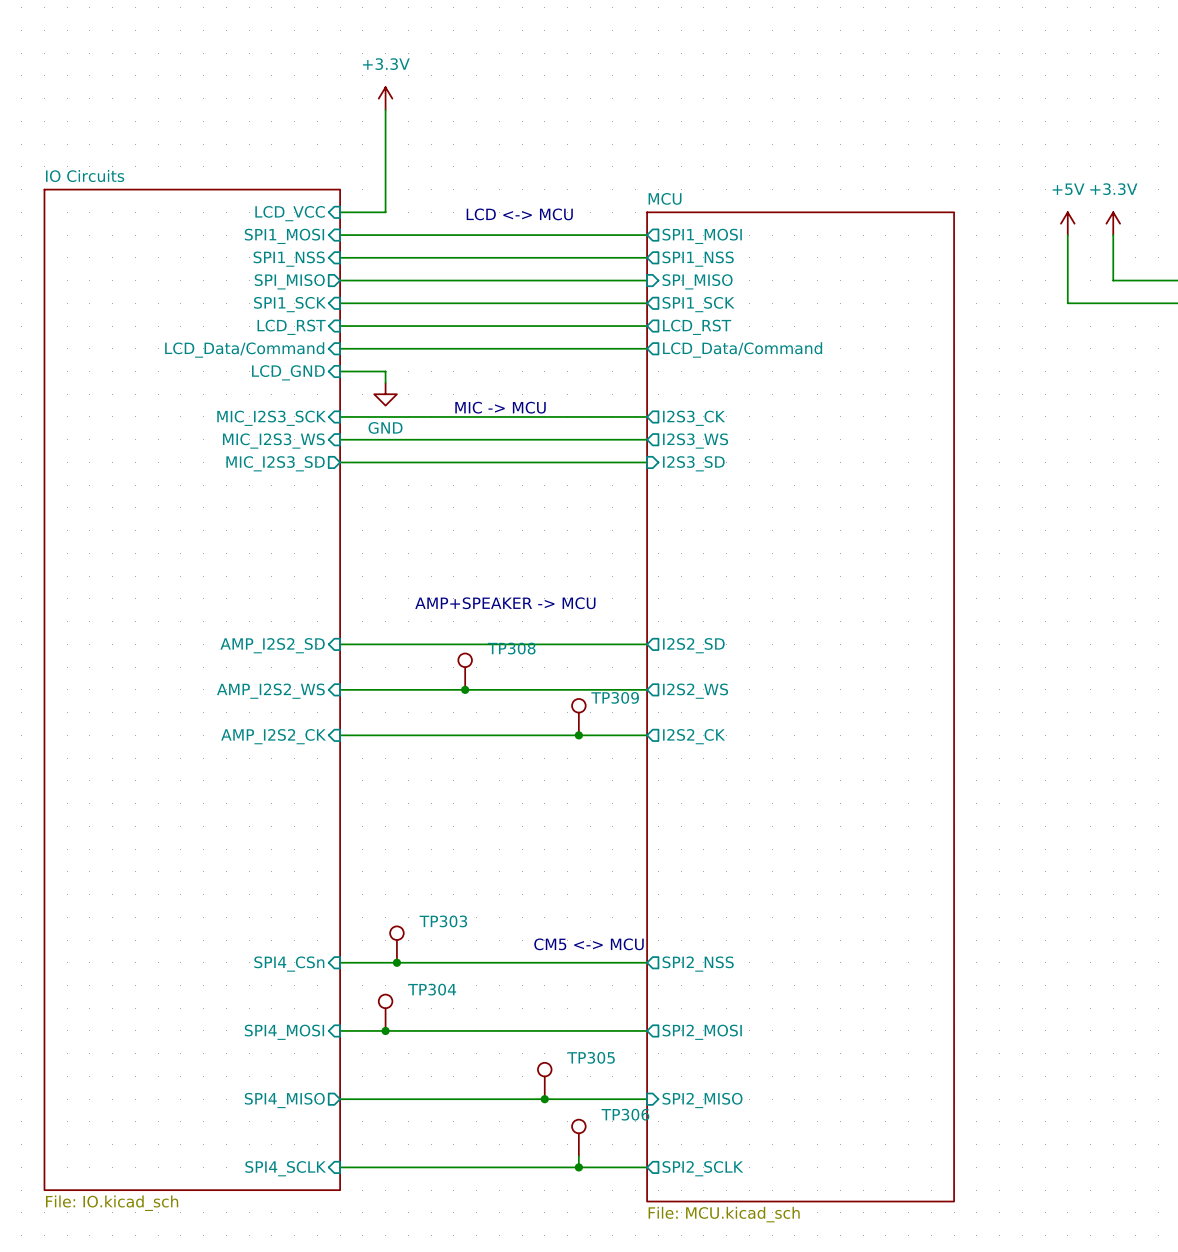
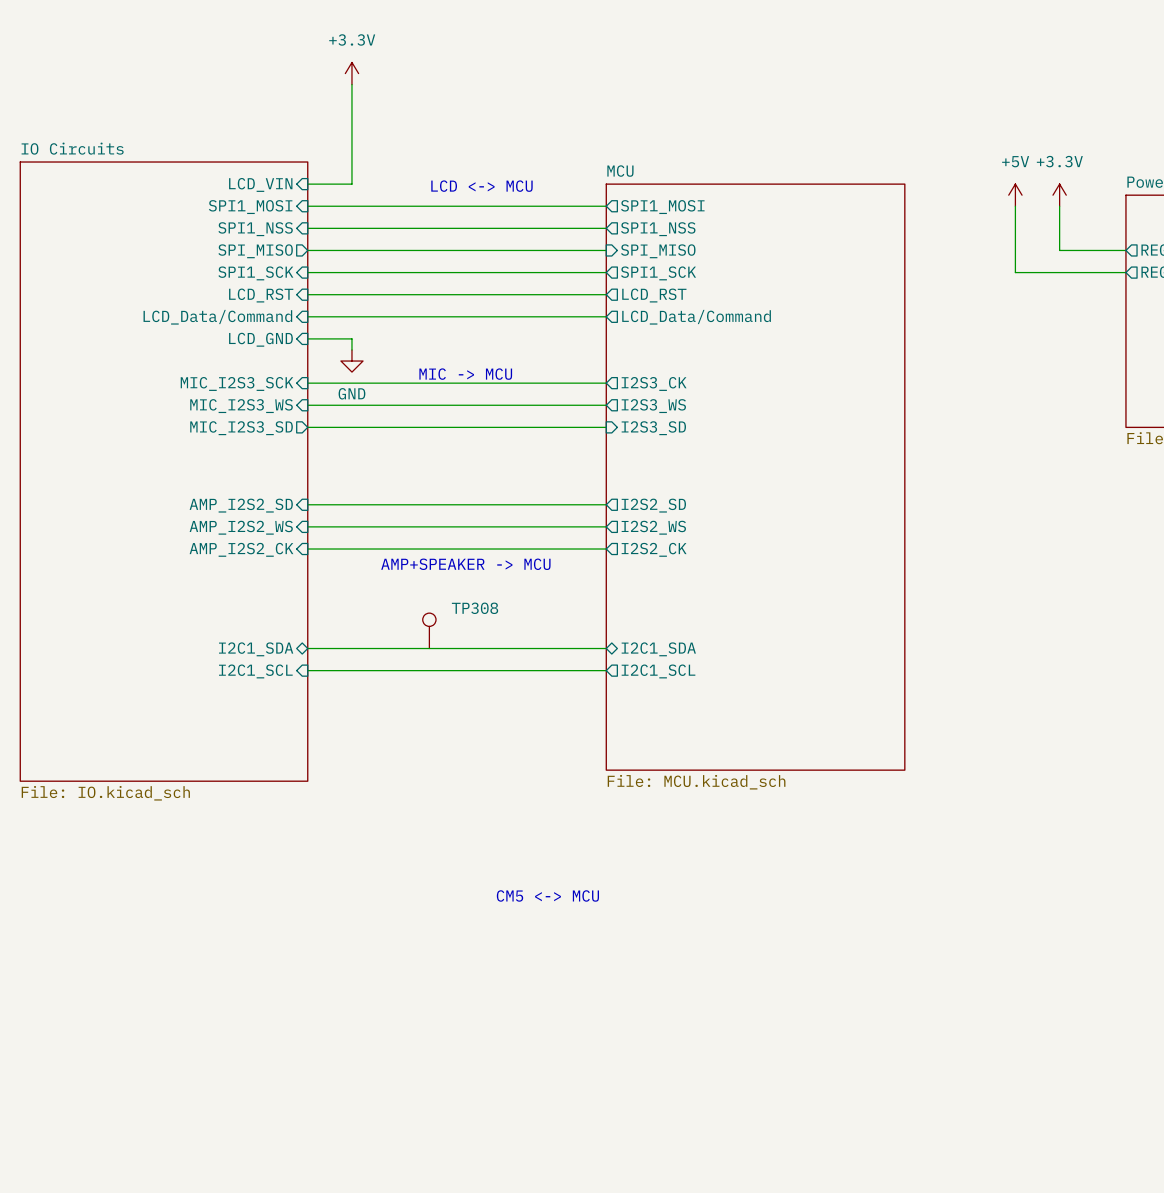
sheet pin: LCD_VCC (290, 213) -> LCD_VIN (260, 184)
sheet IO Circuits: none -> File: IO.kicad_sch (164, 471)
sheet MCU: none -> File: MCU.kicad_sch (755, 477)
wire: none -> (307, 504) (606, 504)
wire: none -> (307, 526) (606, 526)
sheet pin: none -> AMP_I2S2_WS (241, 527)
sheet pin: none -> I2S2_WS (653, 527)
wire: (340, 644) (647, 644) -> (307, 549) (606, 549)
sheet pin position: AMP_I2S2_SD (272, 645) -> AMP_I2S2_SD (241, 505)
sheet pin position: I2S2_SD (693, 645) -> I2S2_SD (653, 505)
sheet IO Circuits: File: IO.kicad_sch (192, 689) -> none
junction: (465, 689) -> none
sheet pin shape: input (270, 691) -> bidirectional (256, 649)
sheet pin: AMP_I2S2_WS (270, 691) -> I2C1_SDA (256, 649)
sheet pin shape: output (695, 691) -> bidirectional (658, 649)
sheet pin: I2S2_WS (695, 691) -> I2C1_SDA (658, 649)
sheet MCU: File: MCU.kicad_sch (800, 706) -> none
sheet pin: none -> I2C1_SCL (255, 671)
sheet pin: none -> I2C1_SCL (658, 671)
TP309: (578, 717) -> none
wire: (340, 735) (647, 735) -> (307, 670) (606, 670)
junction: (578, 735) -> none
sheet pin position: AMP_I2S2_CK (273, 736) -> AMP_I2S2_CK (241, 549)
sheet pin position: I2S2_CK (694, 736) -> I2S2_CK (654, 549)
TP303: (396, 944) -> none
wire: (340, 962) (647, 962) -> none
junction: (396, 962) -> none
sheet pin: SPI4_CSn (289, 964) -> none
sheet pin: SPI2_NSS (698, 964) -> none
TP304: (385, 1012) -> none
wire: (340, 1030) (647, 1030) -> none
junction: (385, 1030) -> none
sheet pin: SPI4_MOSI (284, 1032) -> none
sheet pin: SPI2_MOSI (702, 1032) -> none
TP305: (544, 1081) -> none
wire: (340, 1099) (647, 1099) -> none
junction: (544, 1099) -> none
sheet pin: SPI4_MISO (284, 1100) -> none
sheet pin: SPI2_MISO (702, 1100) -> none
TP306: (578, 1137) -> none
wire: (578, 1156) (578, 1167) -> none
wire: (340, 1167) (647, 1167) -> none
junction: (578, 1167) -> none
sheet pin: SPI4_SCLK (285, 1168) -> none
sheet pin: SPI2_SCLK (702, 1168) -> none

